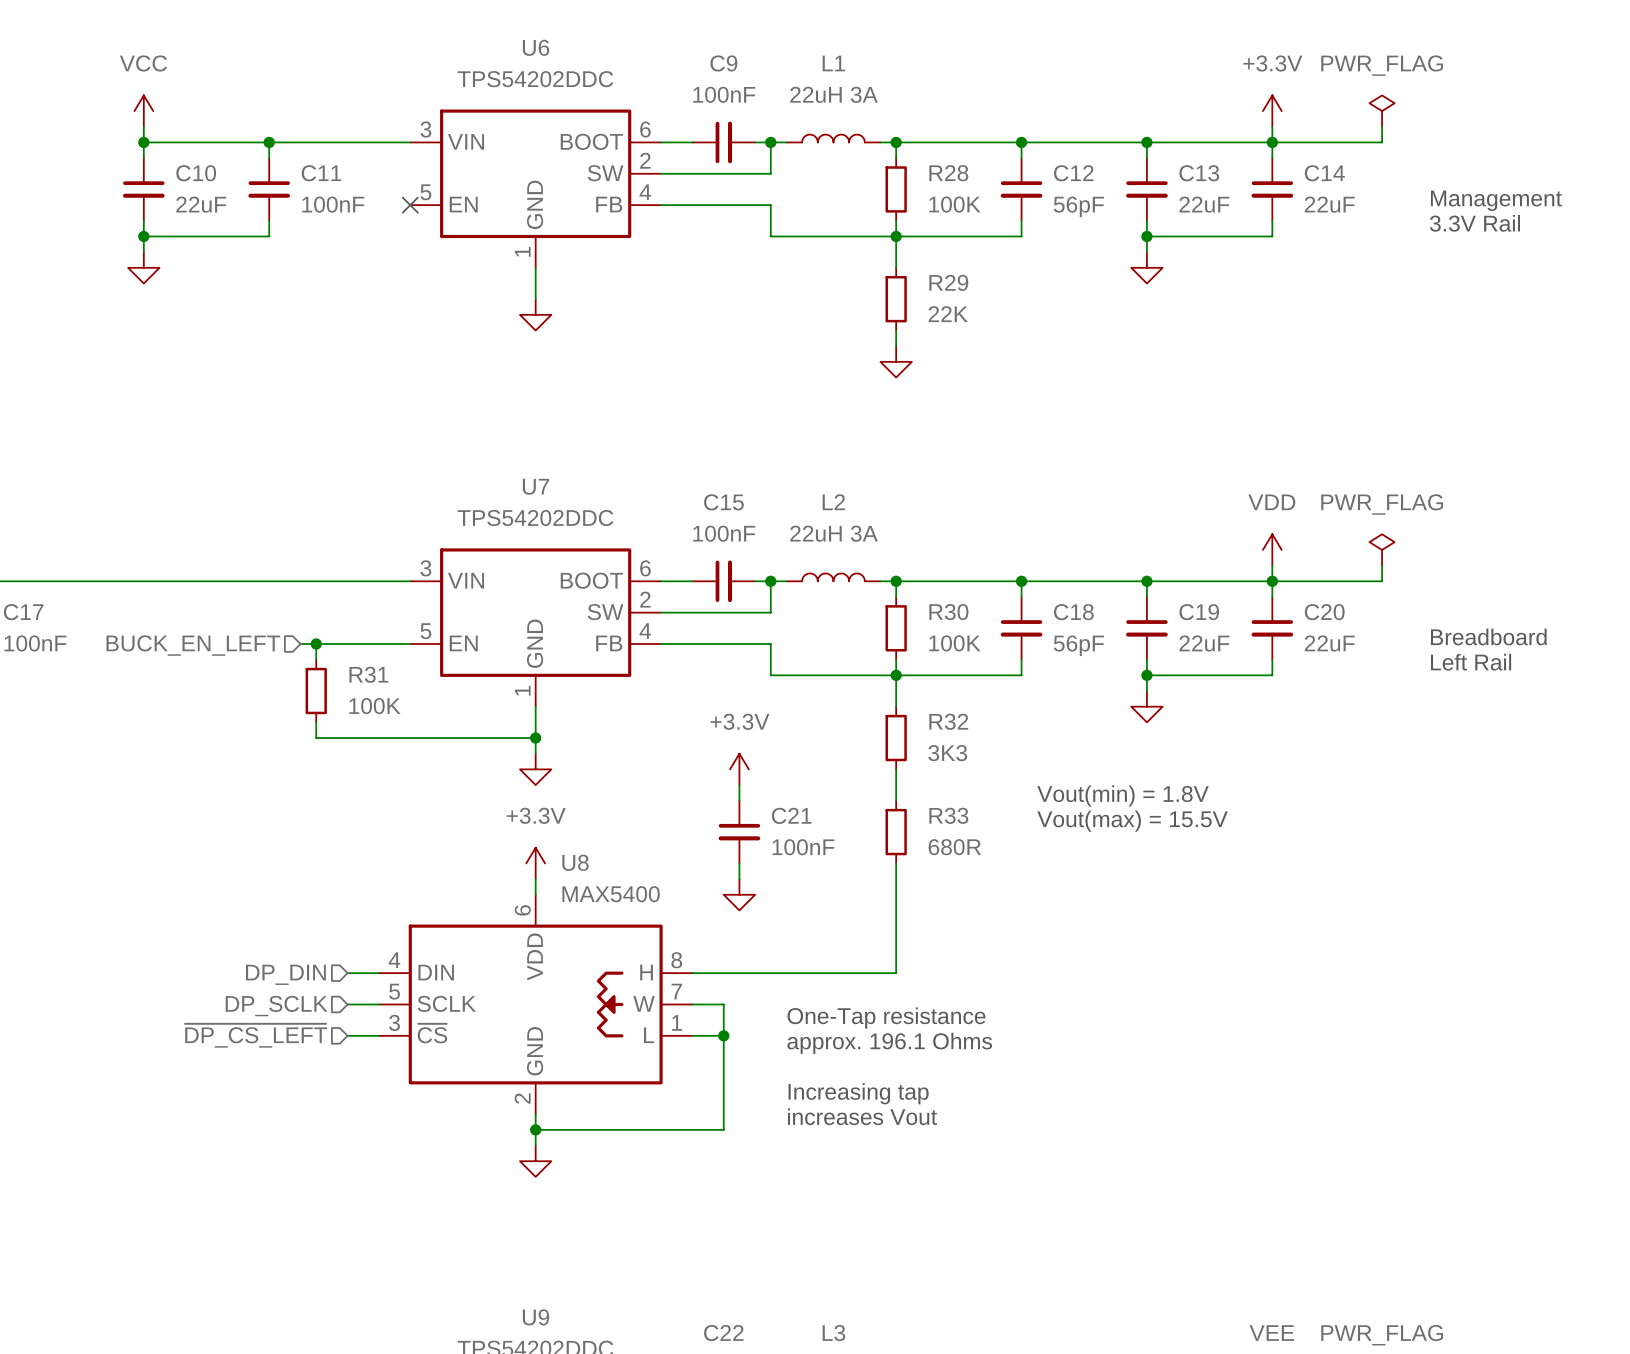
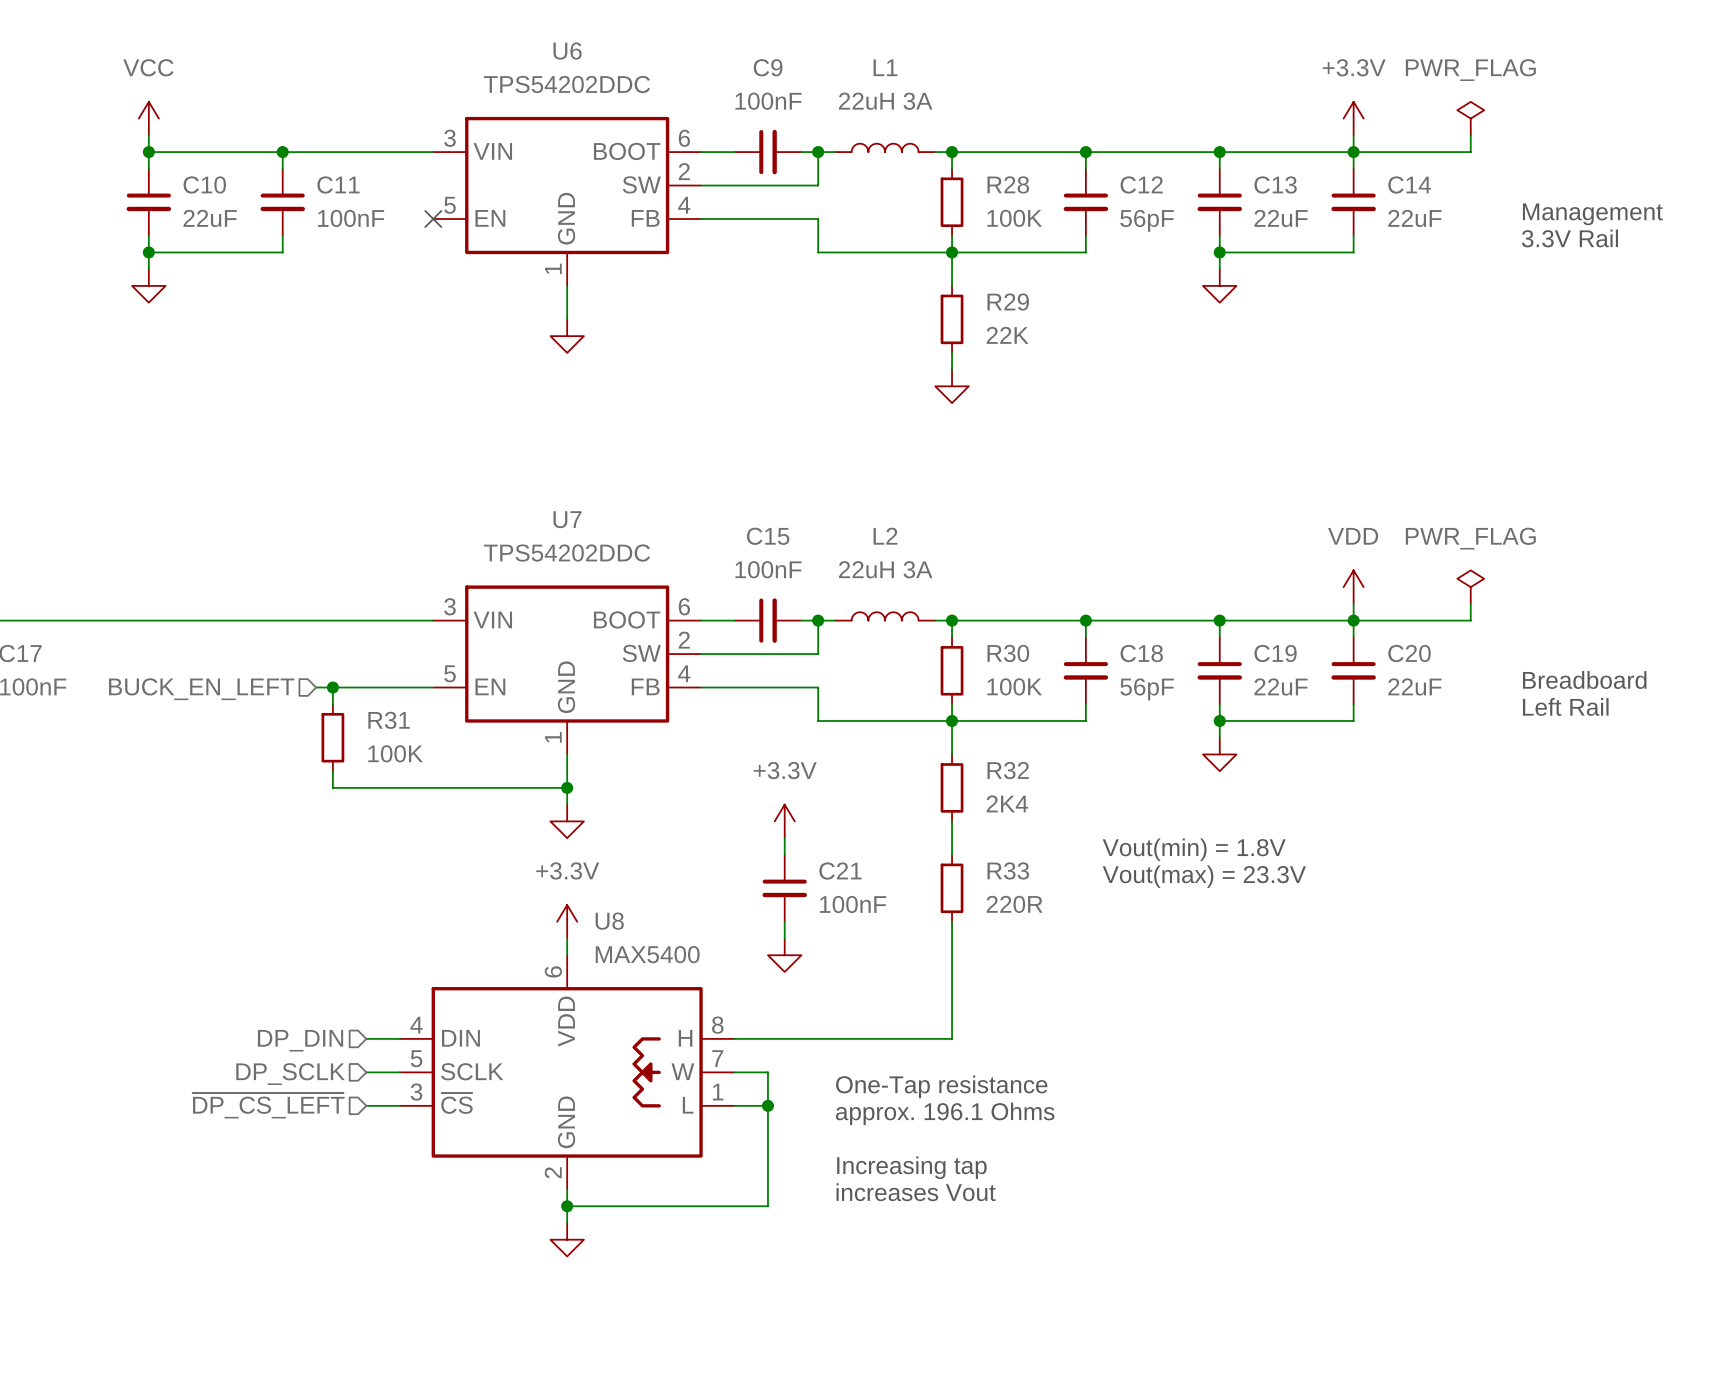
R32 value: 3K3 (947, 753) -> 2K4 (1007, 803)
text: Vout(max) = 15.5V (1132, 821) -> Vout(max) = 23.3V (1204, 876)
R33 value: 680R (954, 847) -> 220R (1014, 904)

